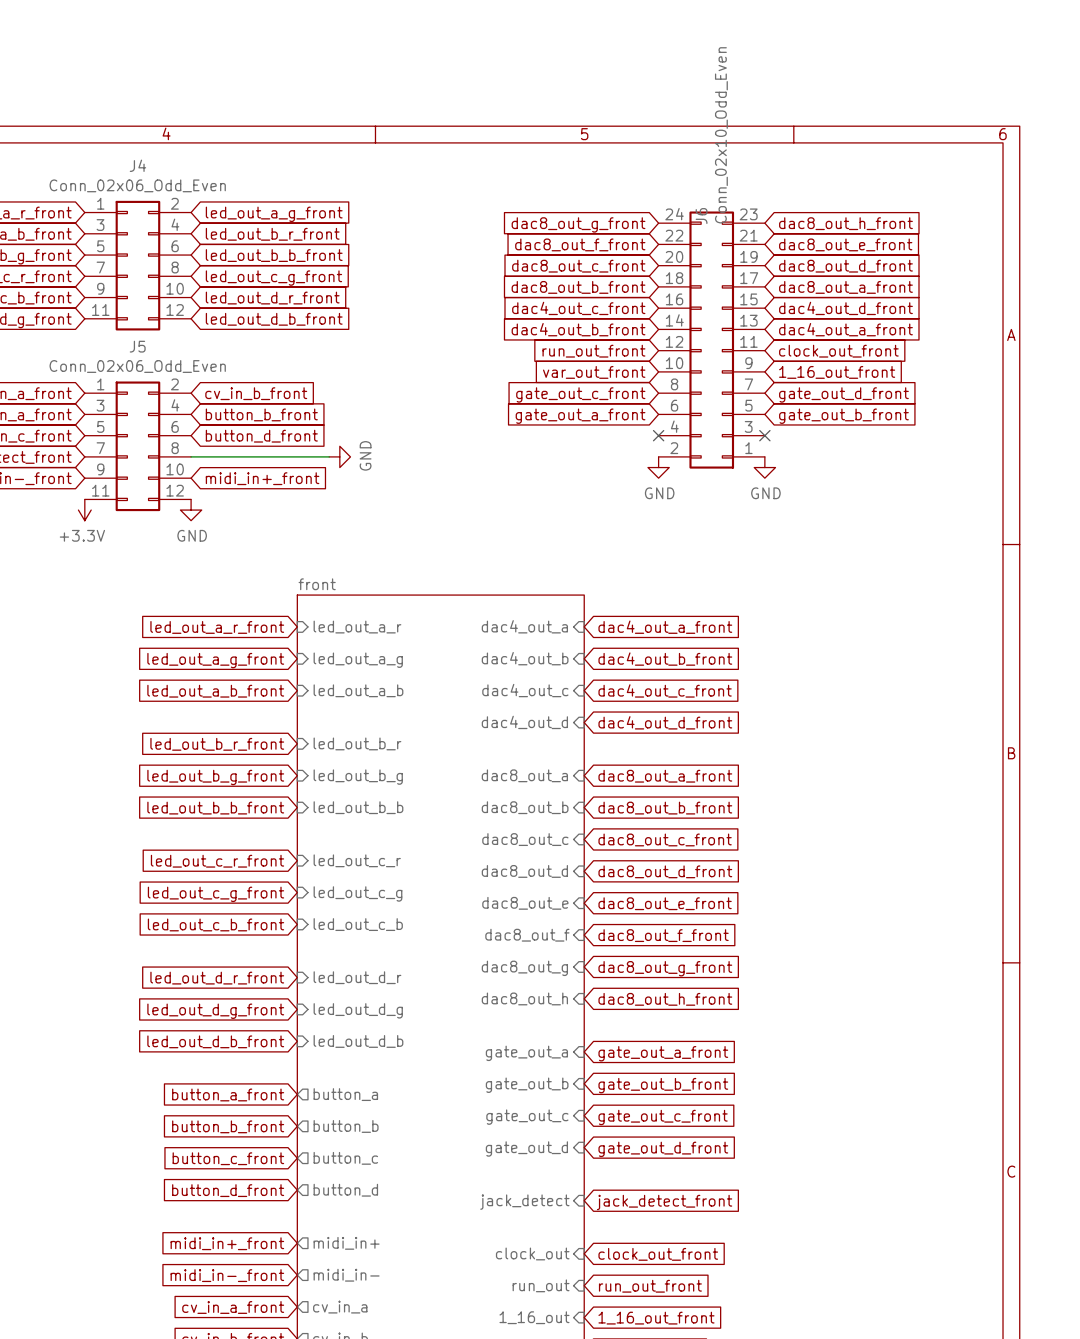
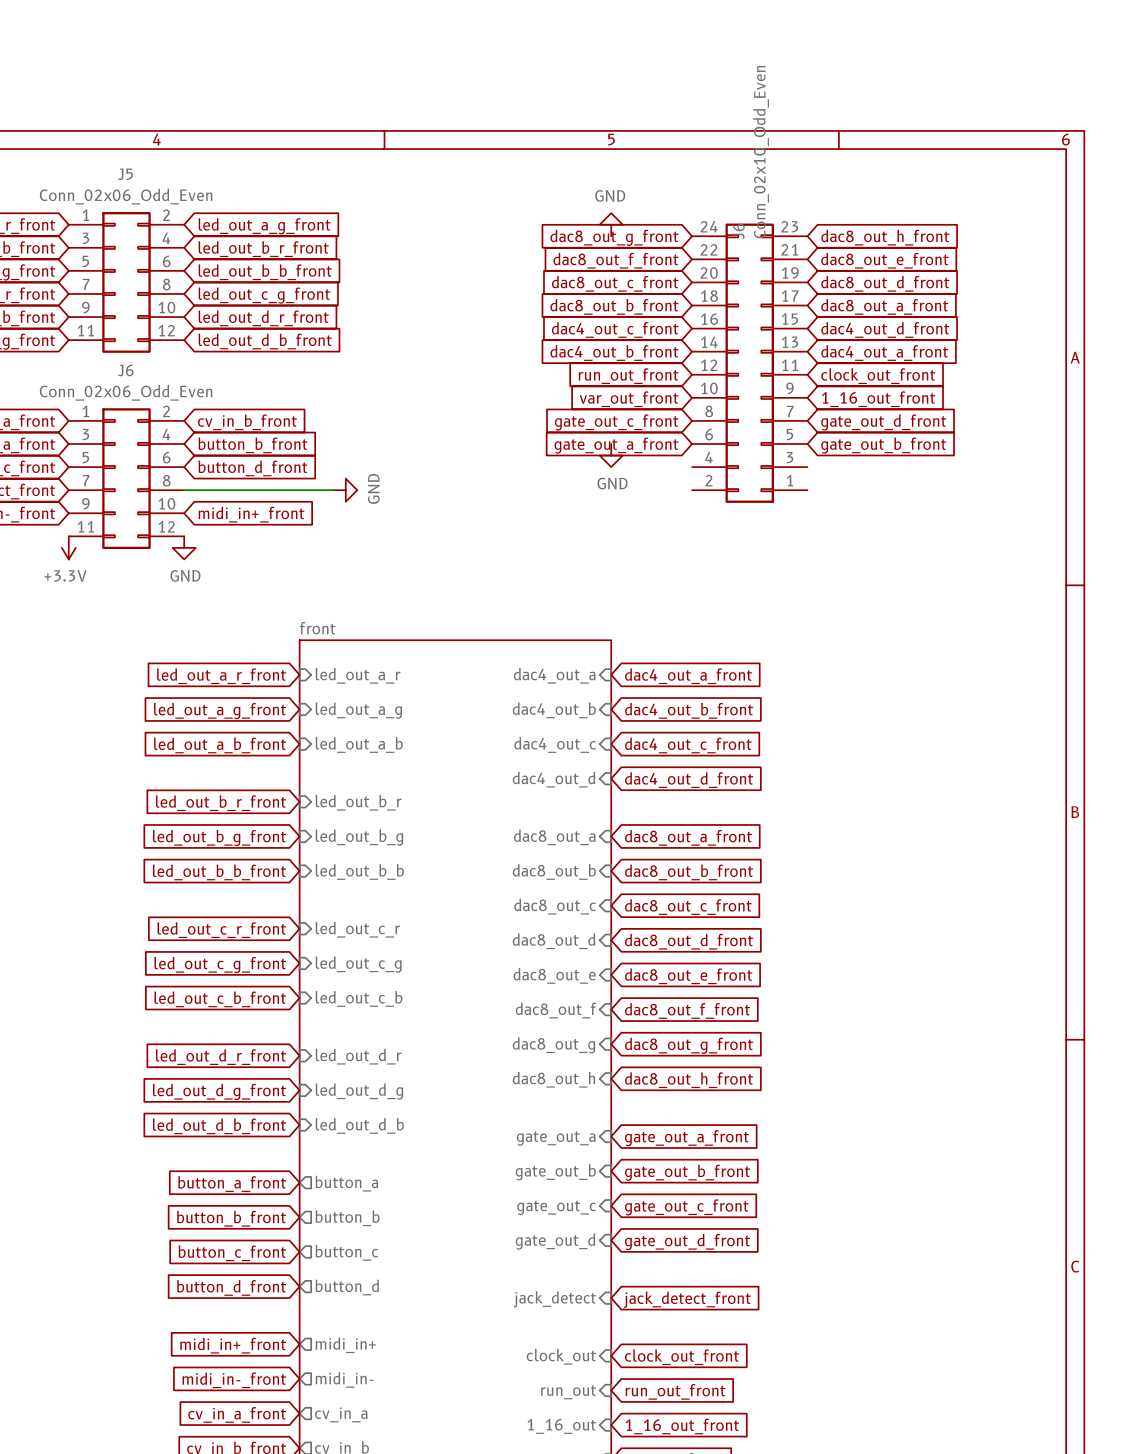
J4 name: J4 (137, 165) -> J5 (125, 174)
power symbol: none -> GND (611, 224)
J5 name: J5 (137, 346) -> J6 (125, 370)
no-connect mark: (658, 435) -> none
no-connect mark: (764, 435) -> none
power symbol position: GND (658, 467) -> GND (611, 455)
power symbol: GND (764, 467) -> none

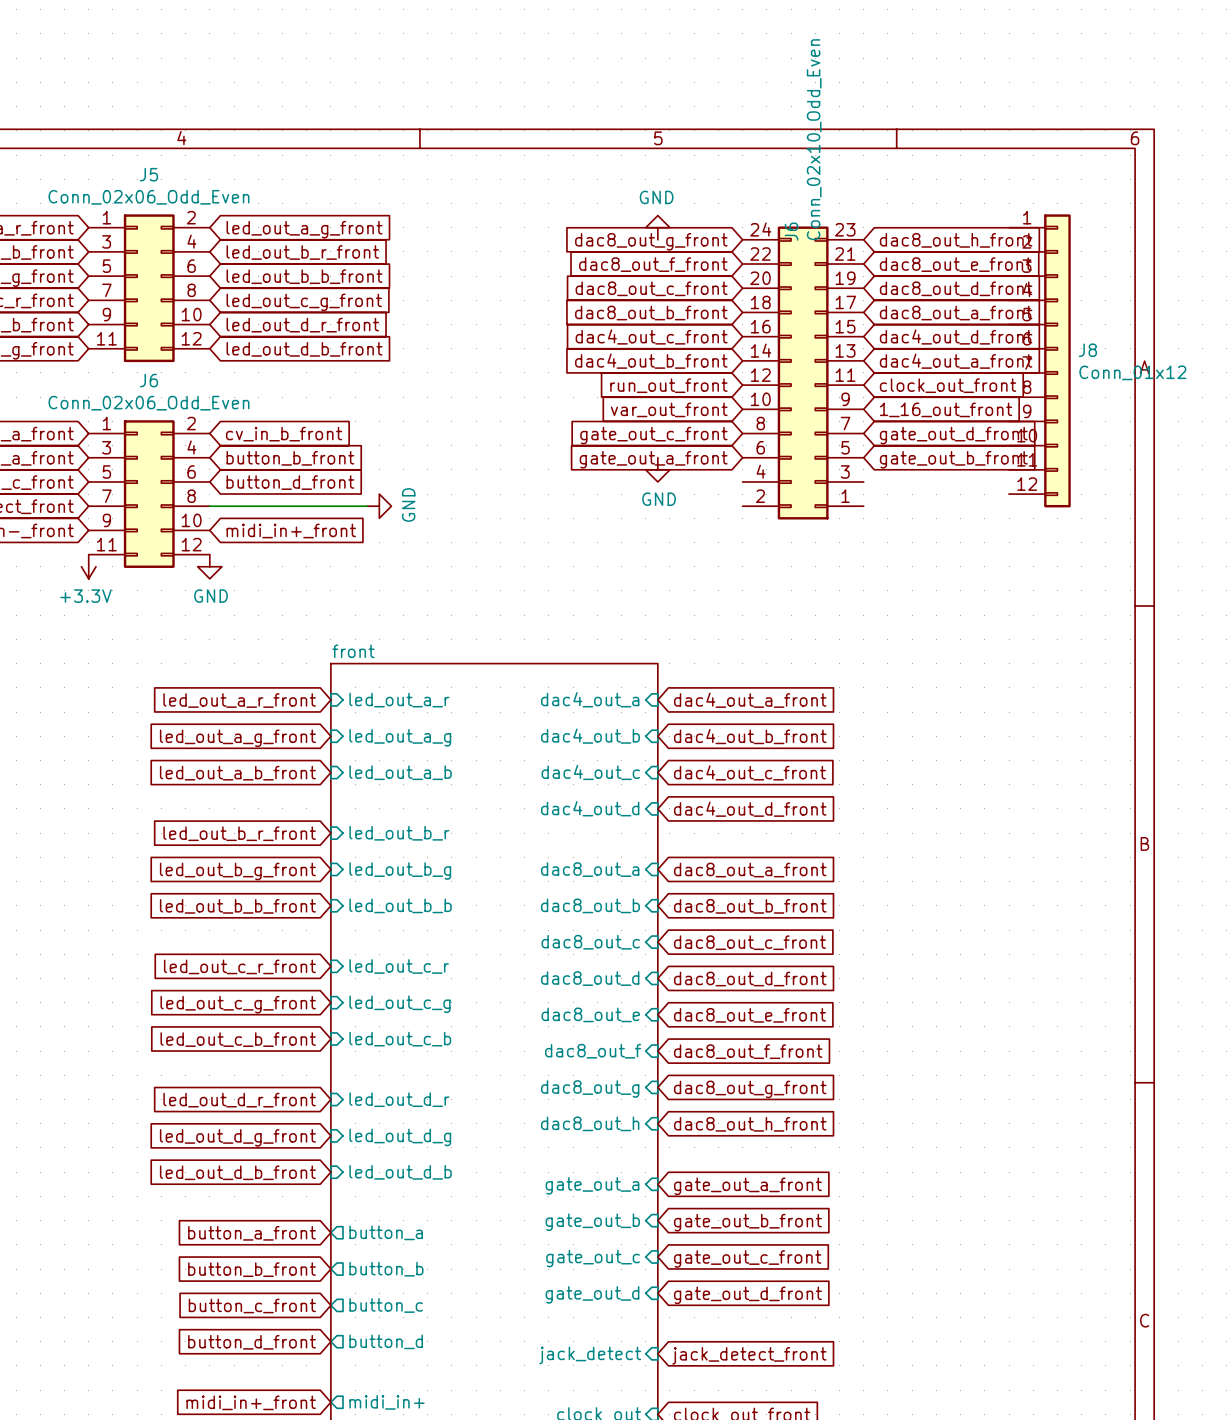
J8: none -> Conn_01x12 (1039, 360)

